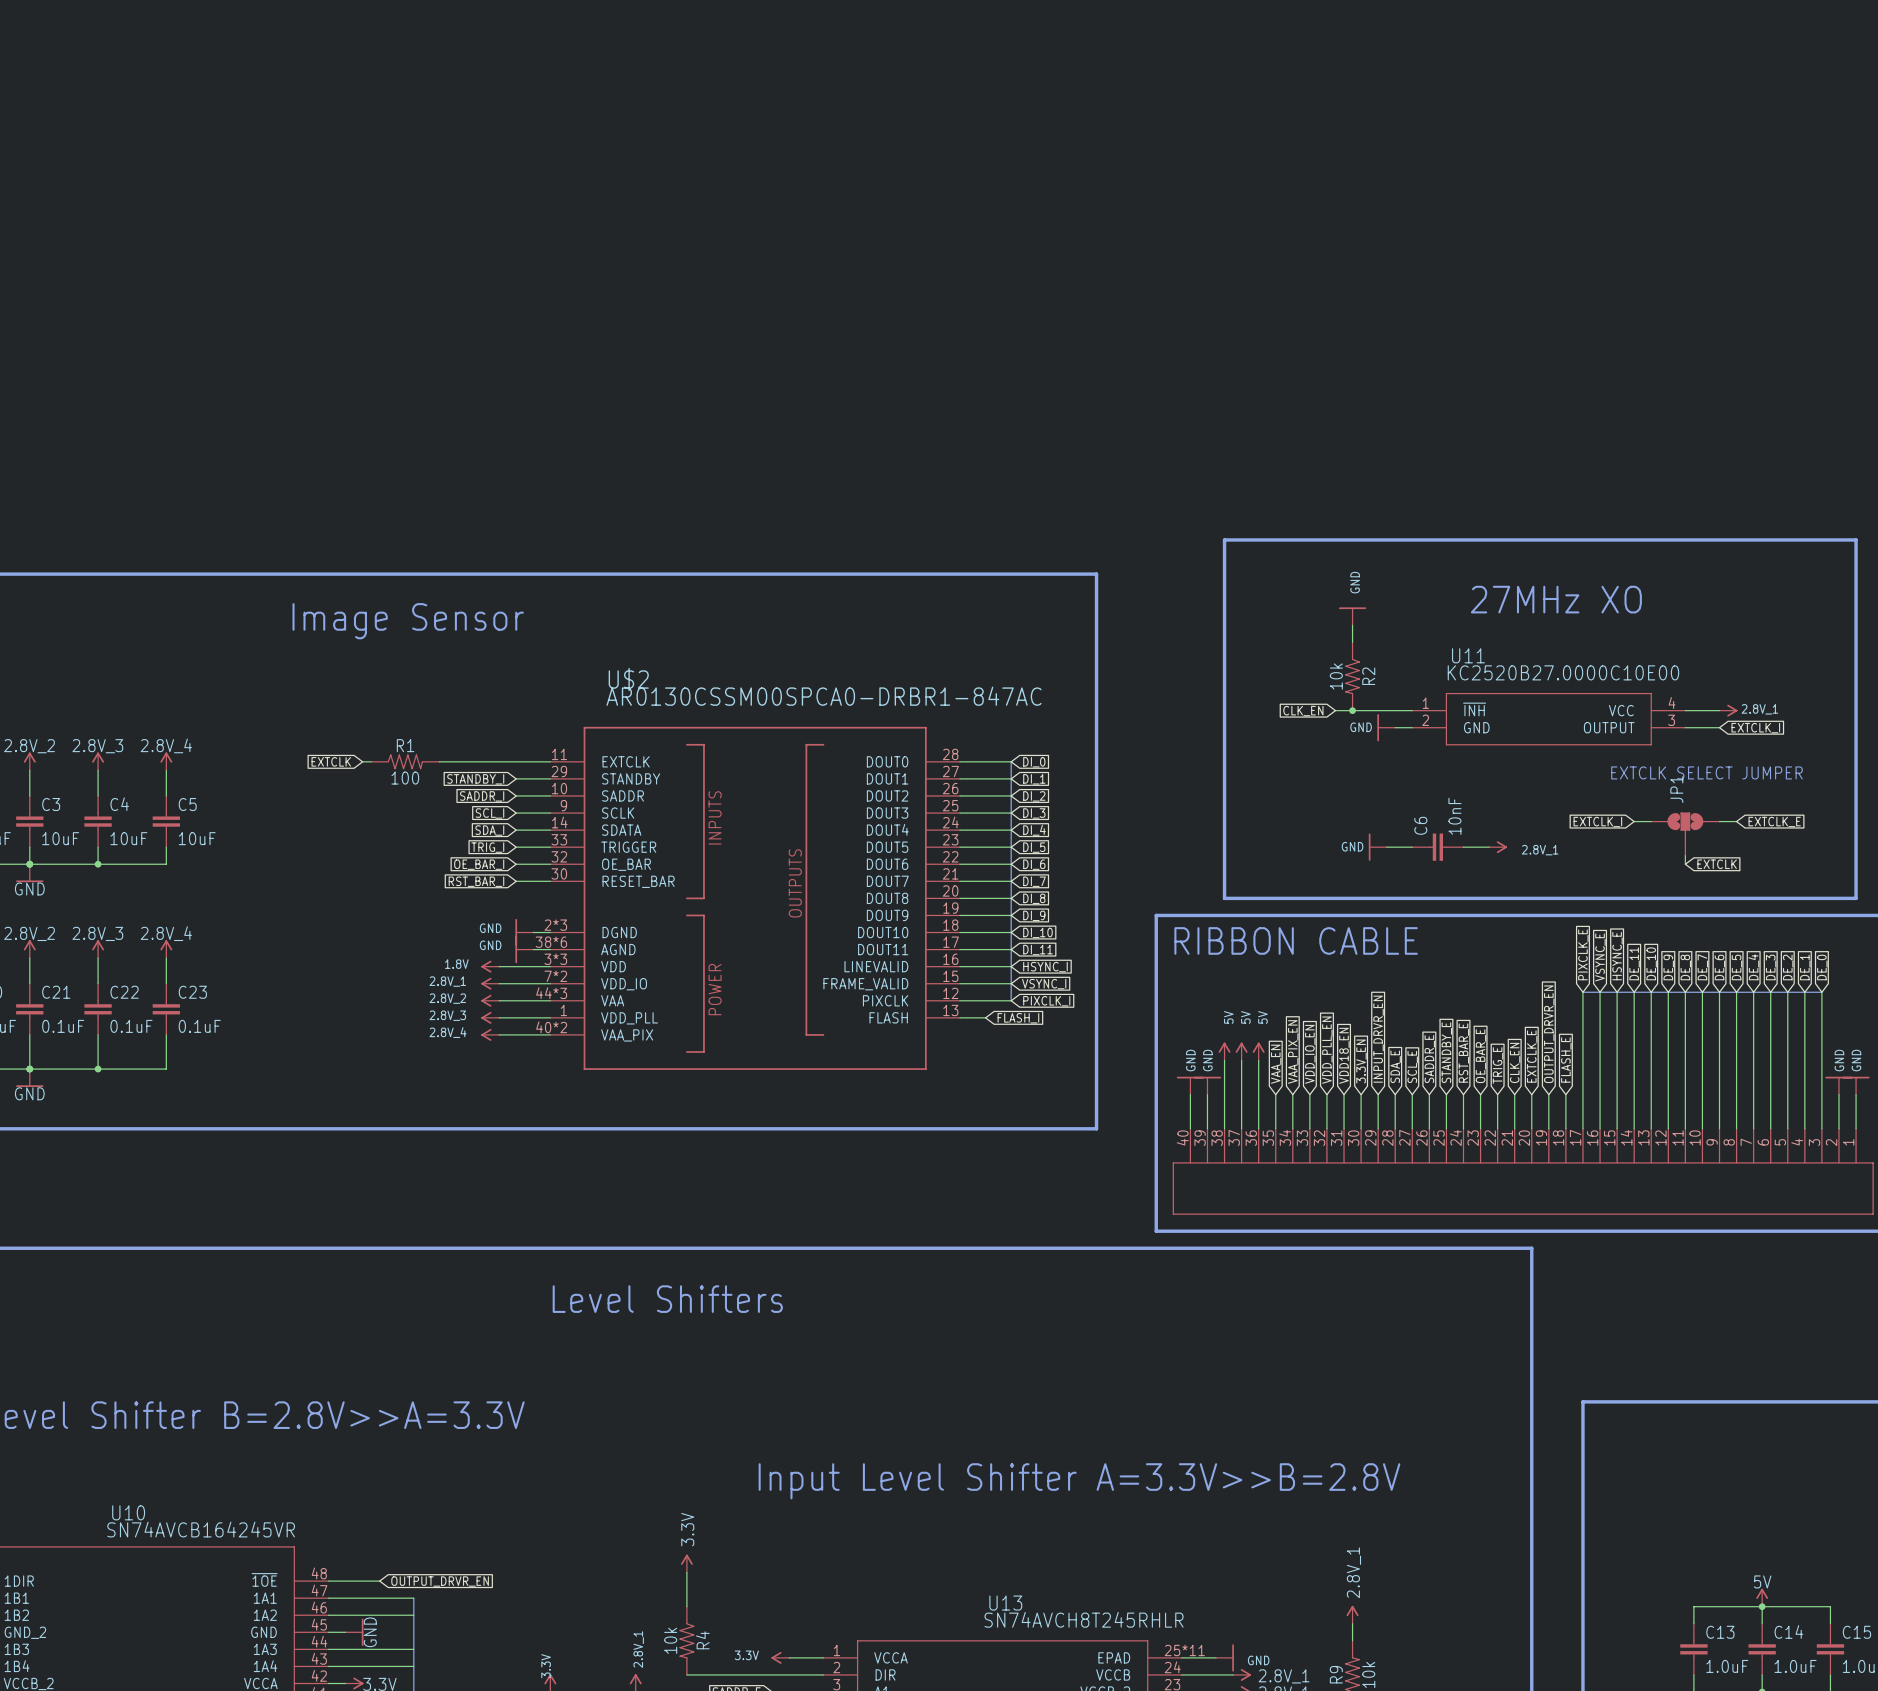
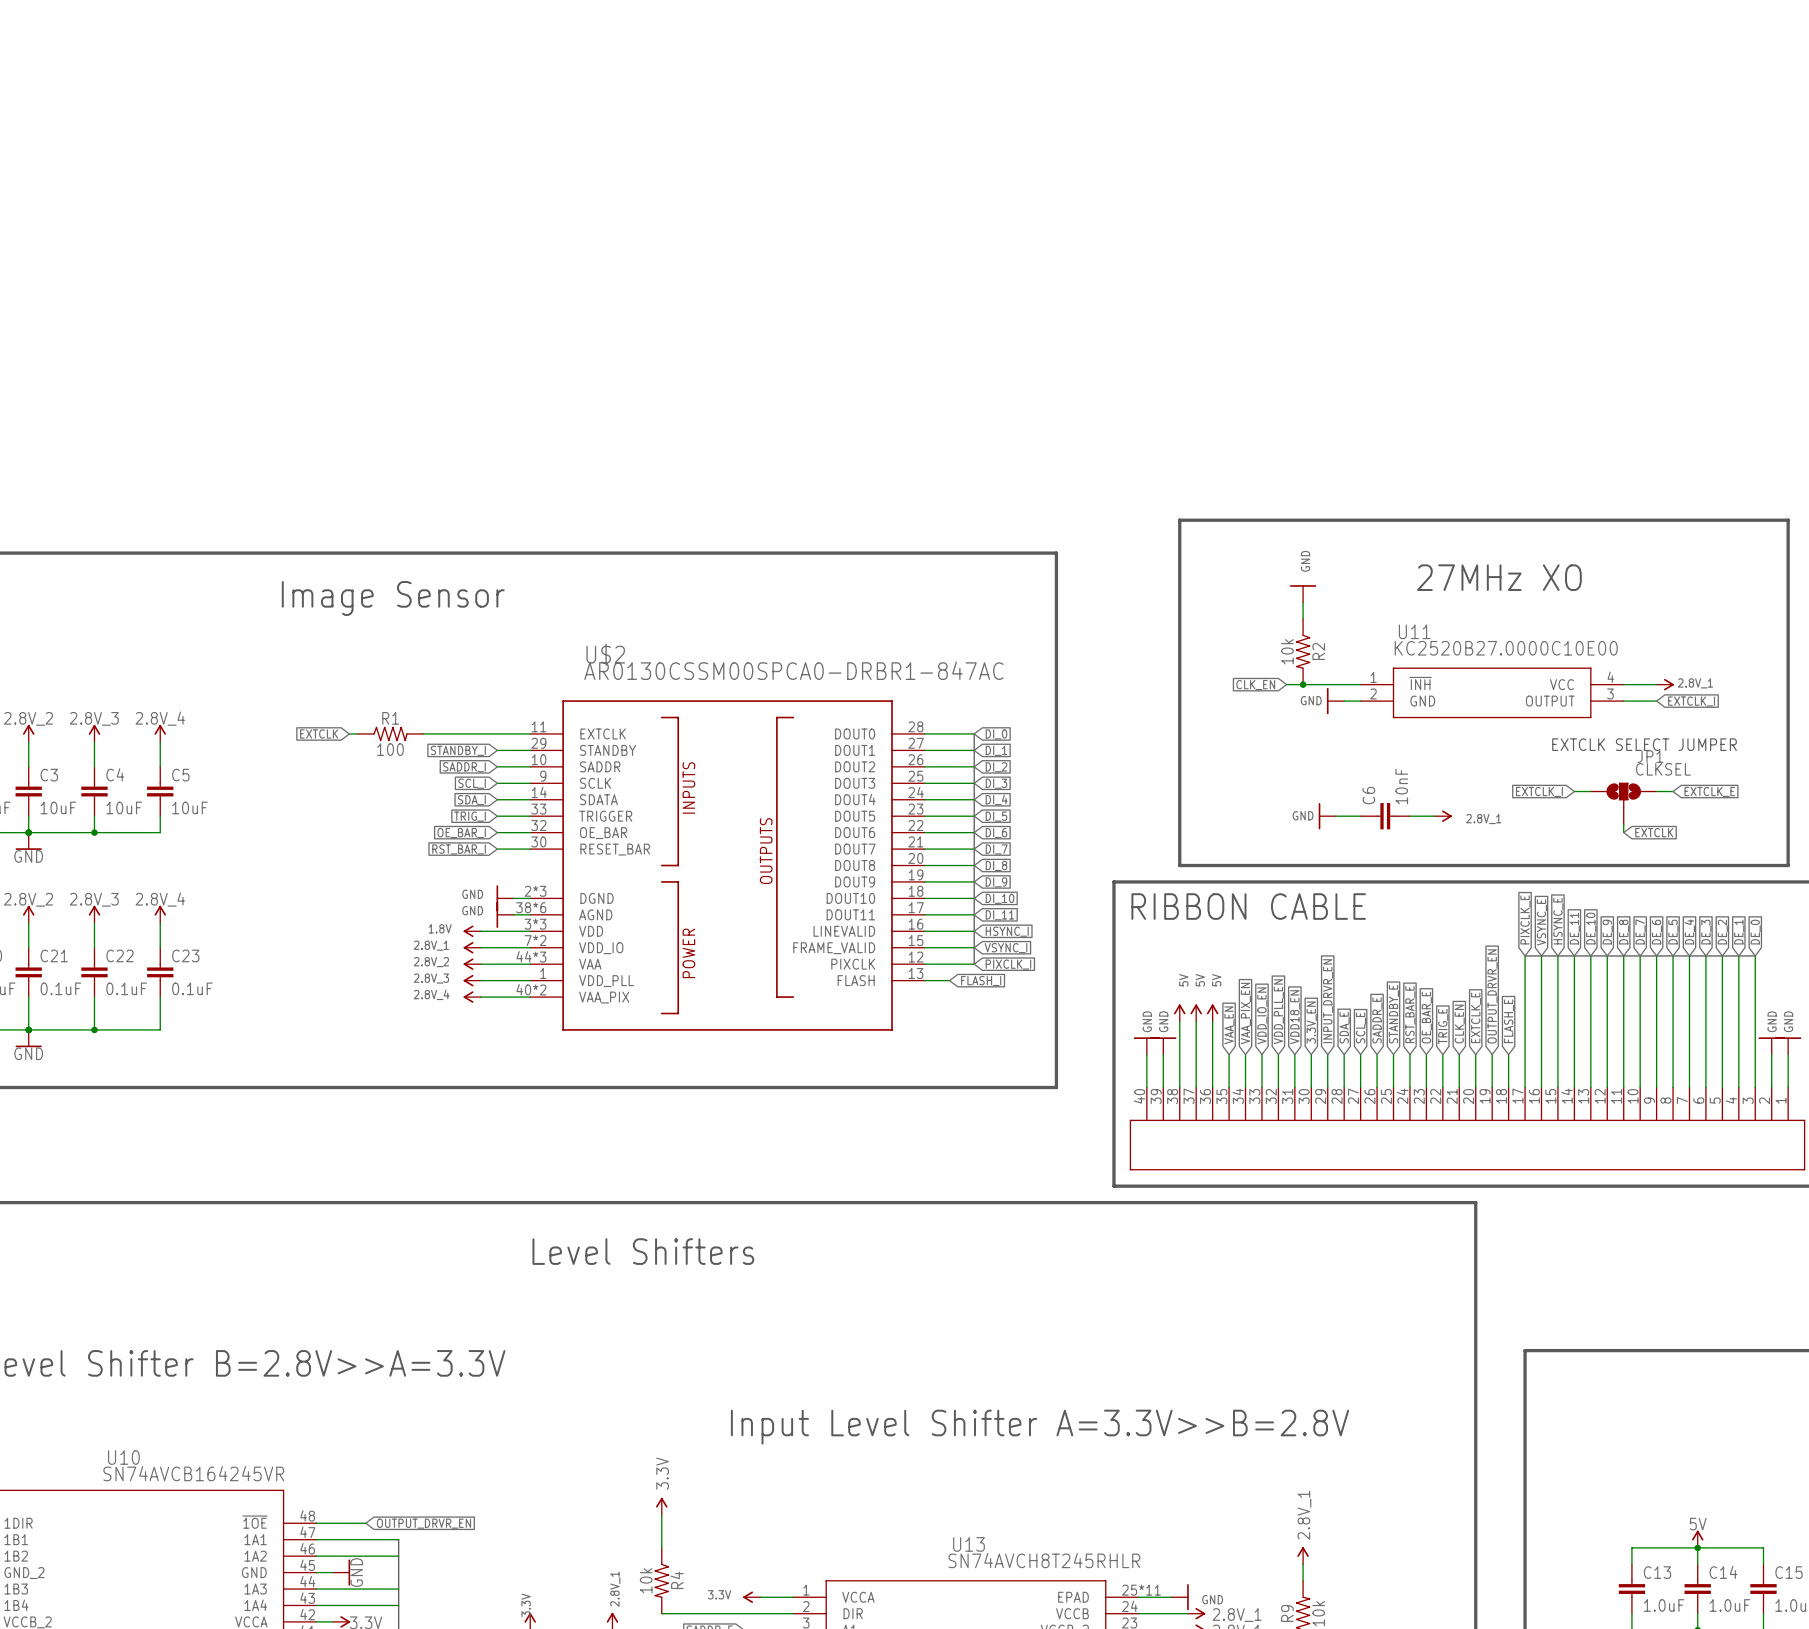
JP1 name rotation: 0° (1676, 789) -> 90° clockwise (1650, 756)
JP1 name position: JP1 (1676, 789) -> JP1 (1650, 756)
JP1 value: none -> CLKSEL (1663, 769)

